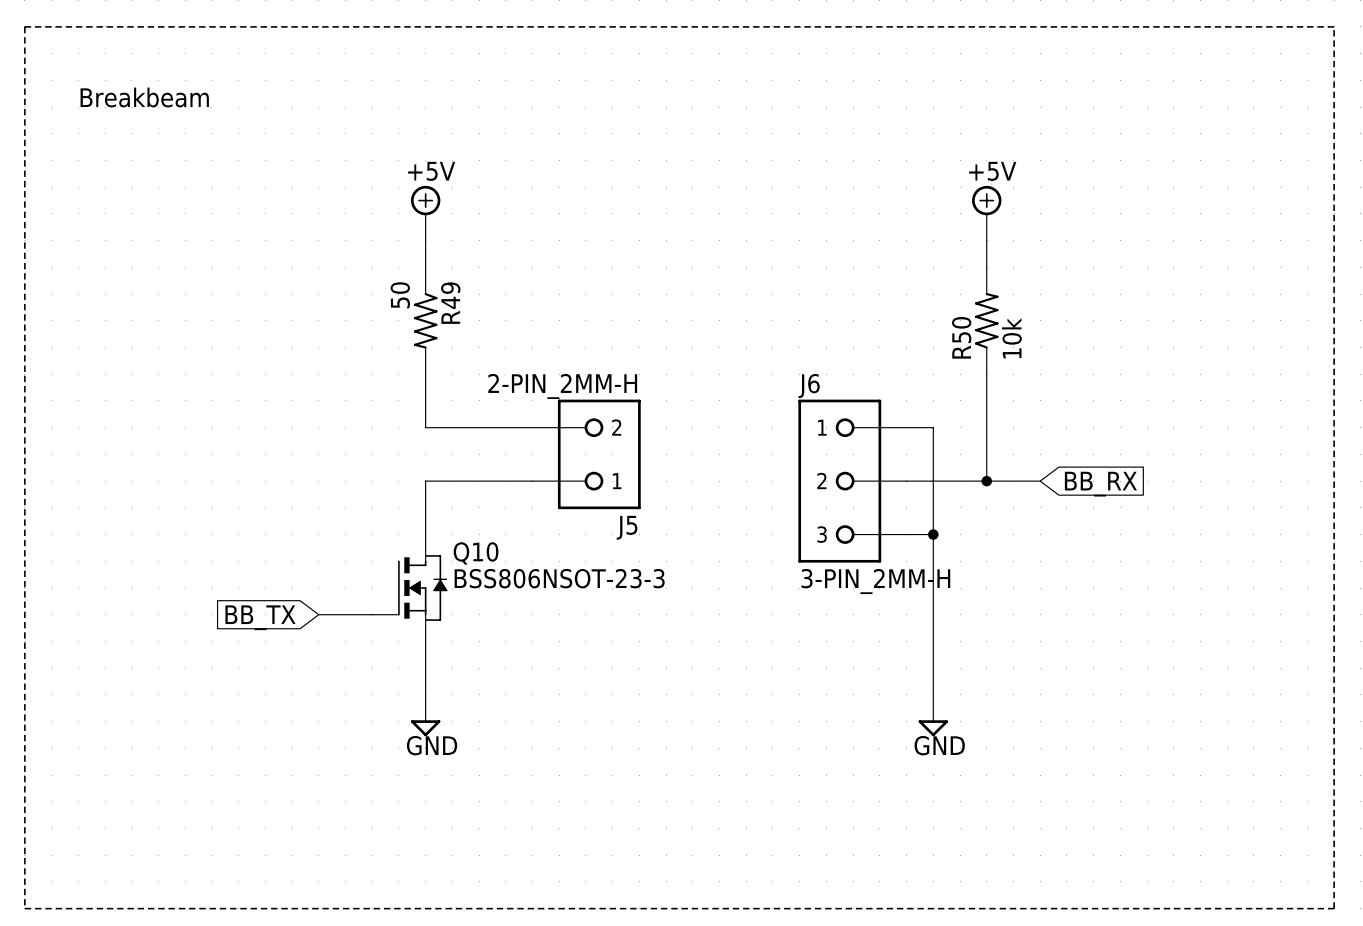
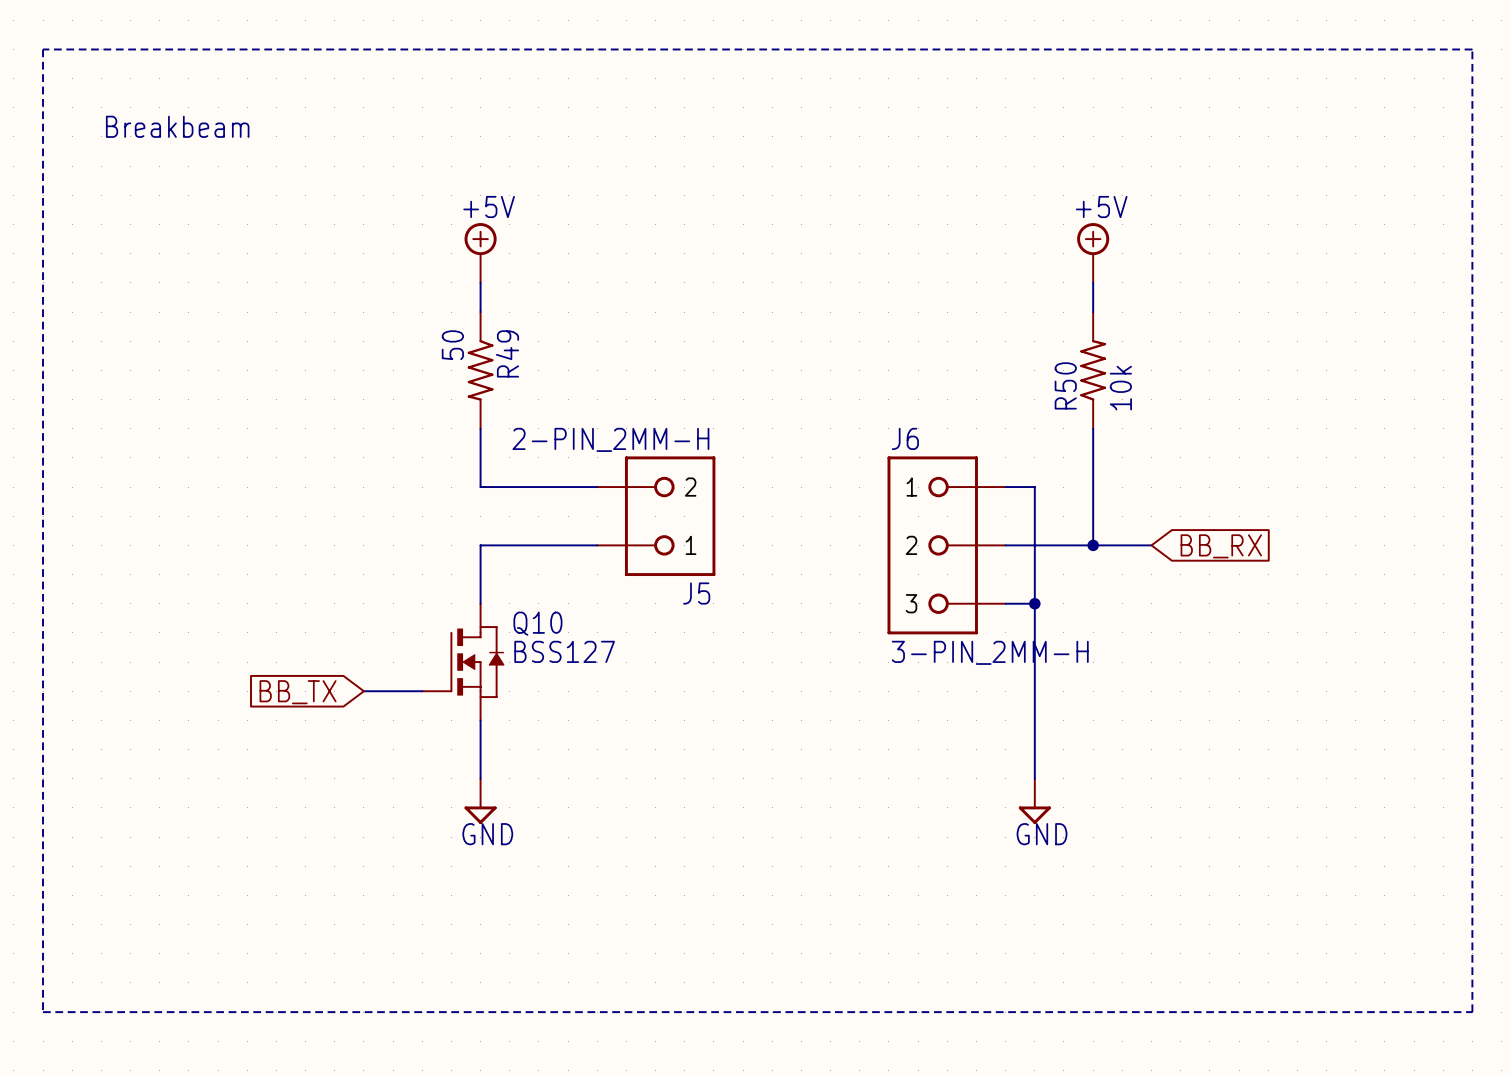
Q10 value: BSS806NSOT-23-3 (559, 578) -> BSS127 (564, 651)

